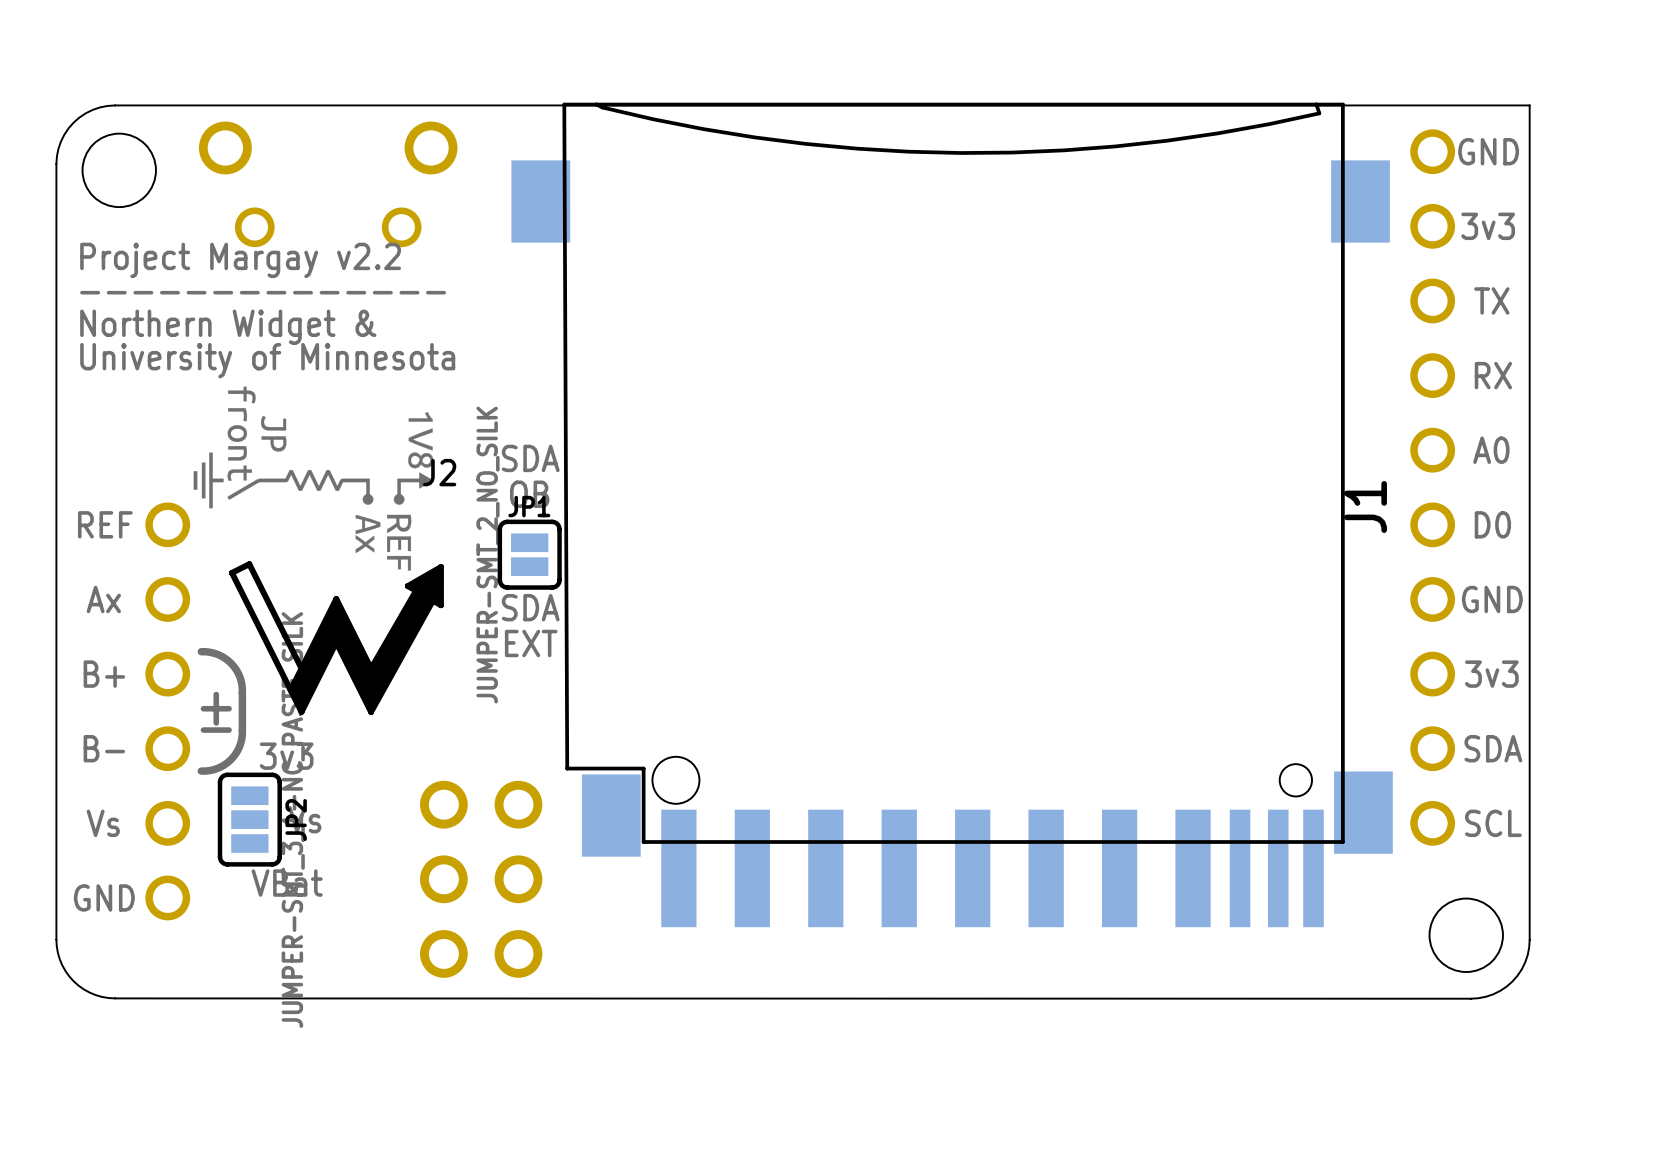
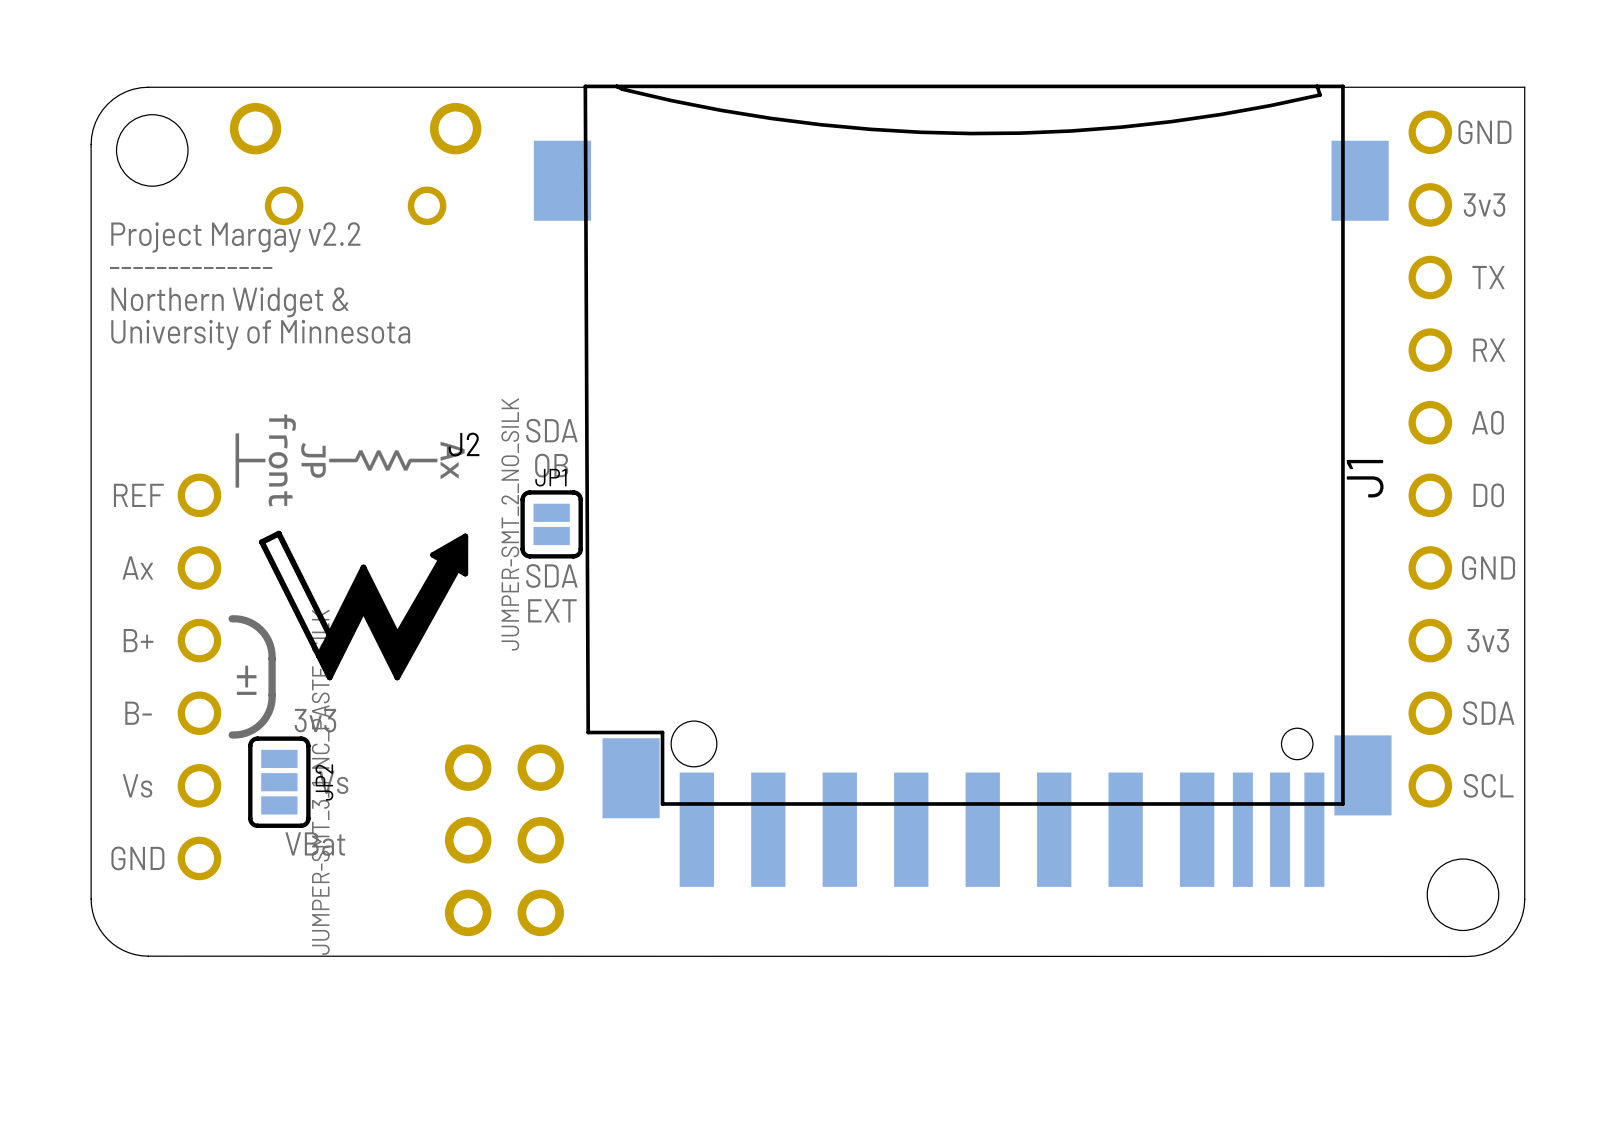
drawing shape: [193, 386, 434, 571] -> [235, 414, 465, 507]

